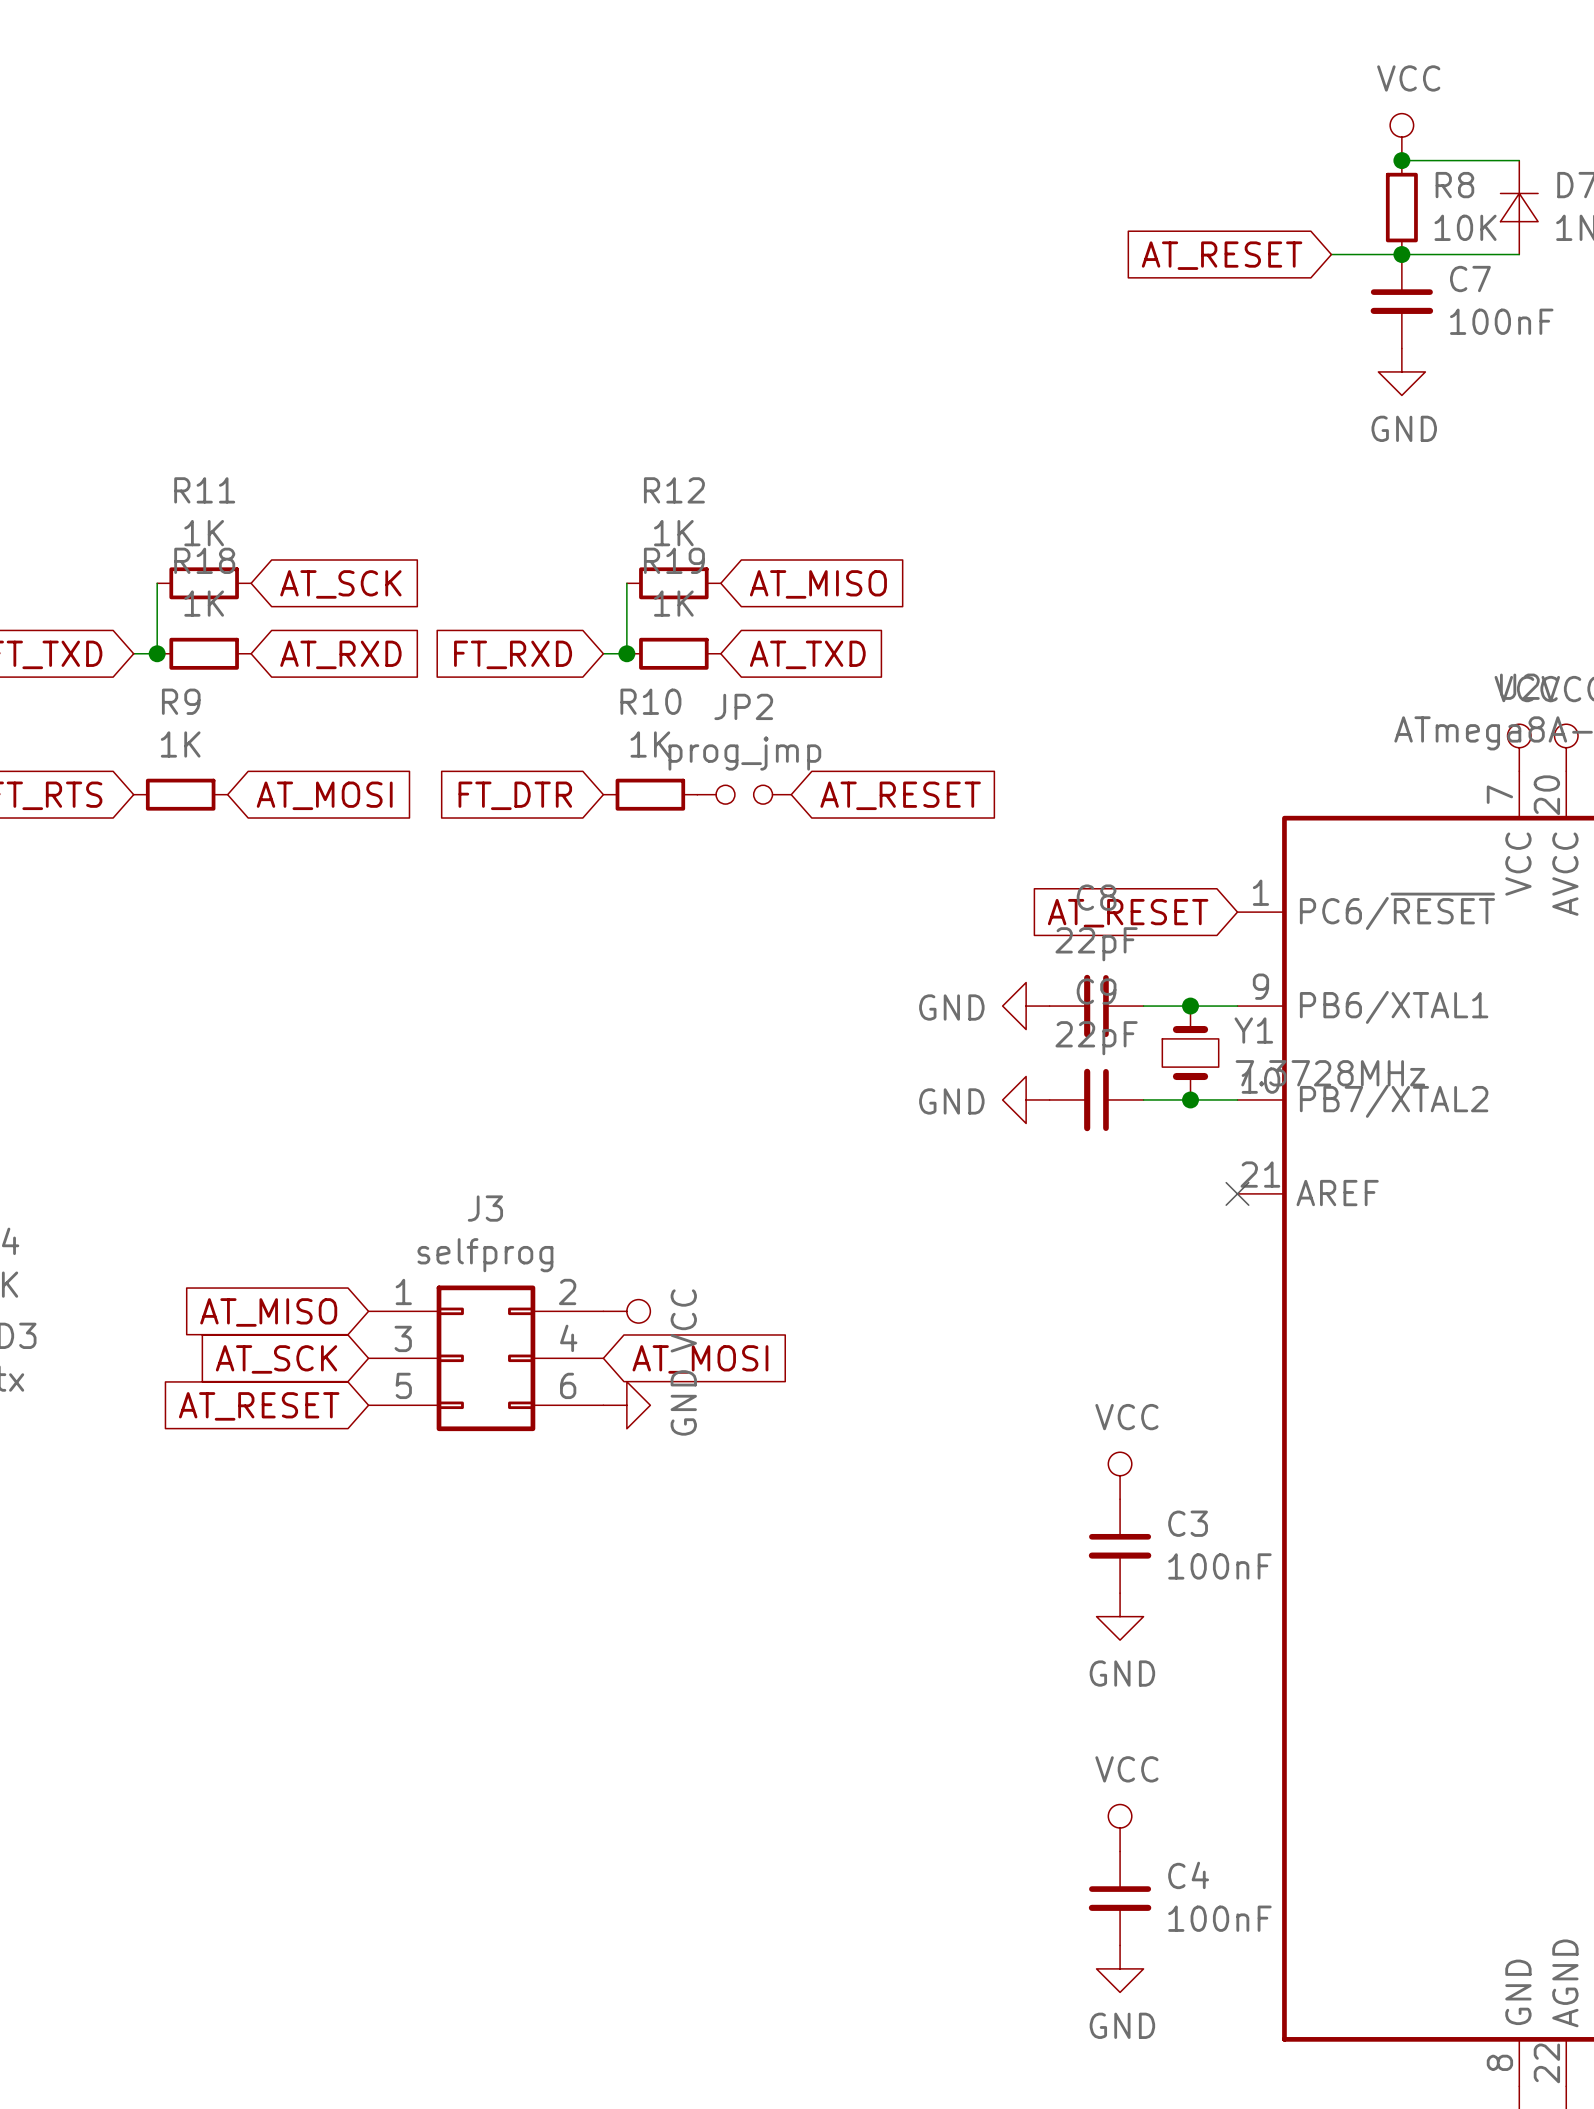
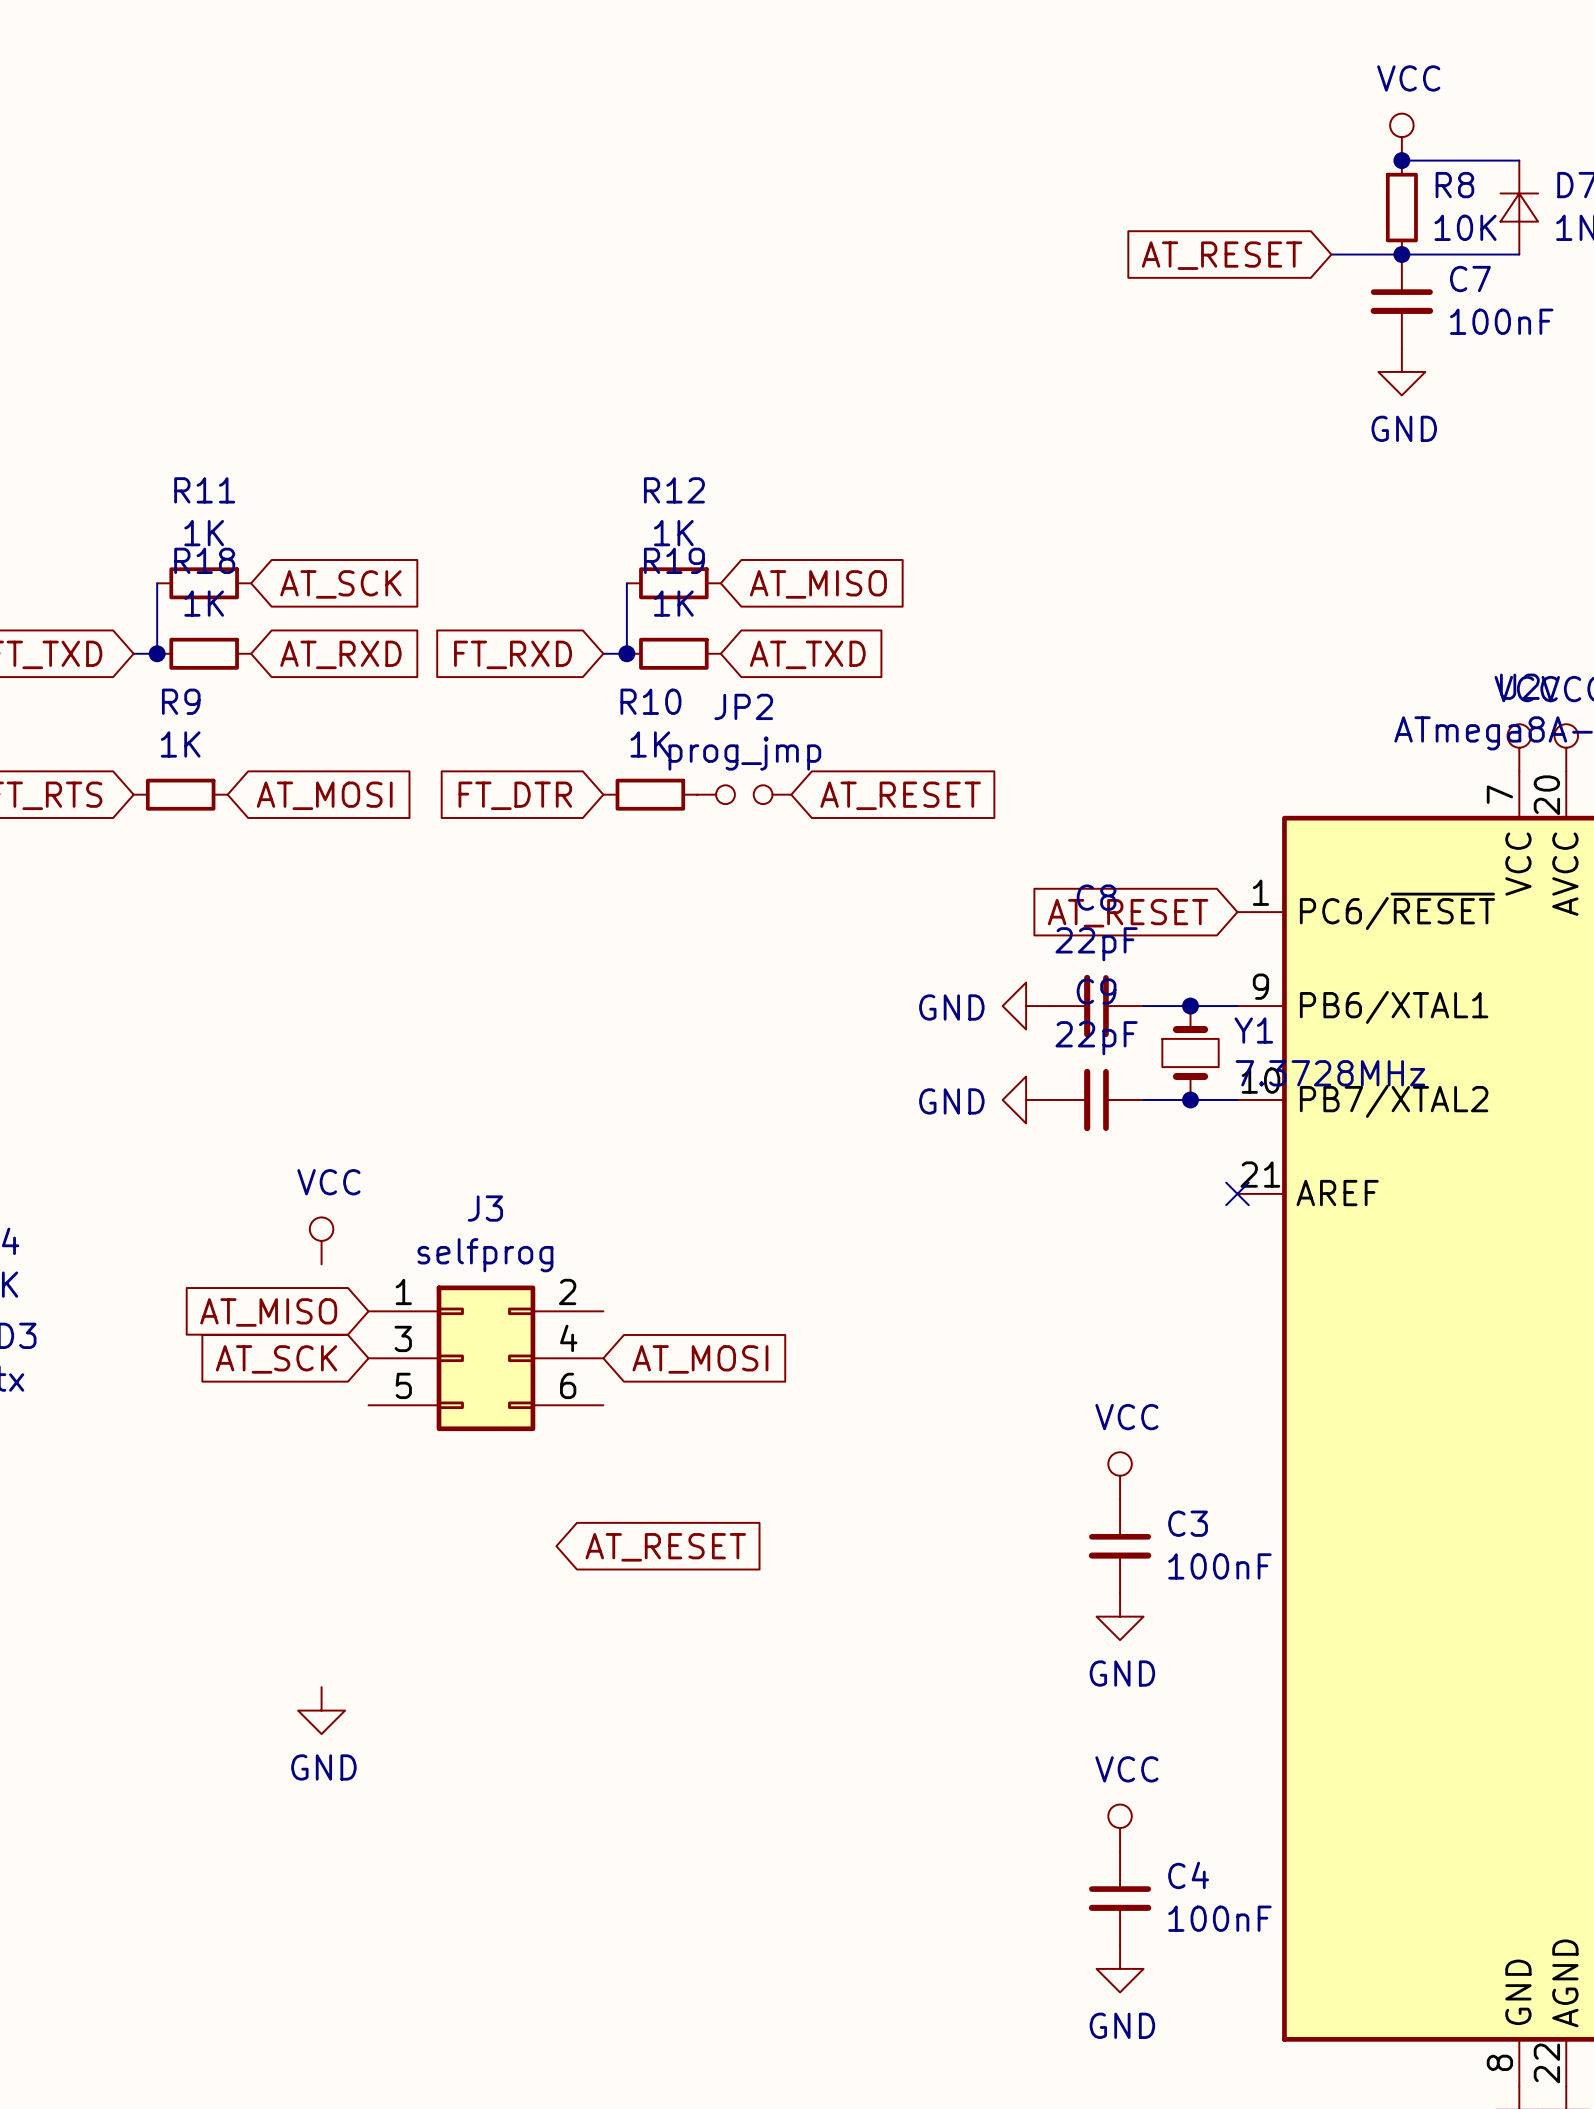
power symbol rotation: 0° (626, 1311) -> 90° counterclockwise (321, 1240)
power symbol position: VCC (626, 1311) -> VCC (321, 1240)
power symbol rotation: 0° (626, 1405) -> 90° clockwise (321, 1710)
power symbol position: GND (626, 1405) -> GND (321, 1710)
global label rotation: 0° (259, 1406) -> 180° (665, 1547)
global label position: AT_RESET (259, 1406) -> AT_RESET (665, 1547)

